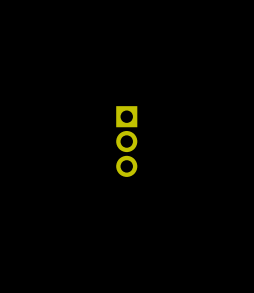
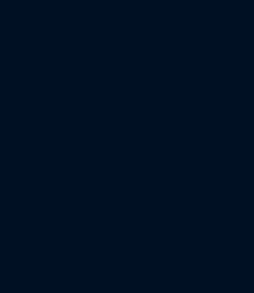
part: (126, 141) -> none

